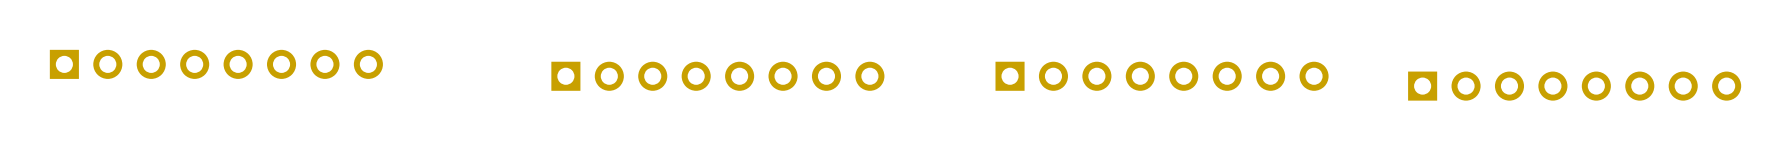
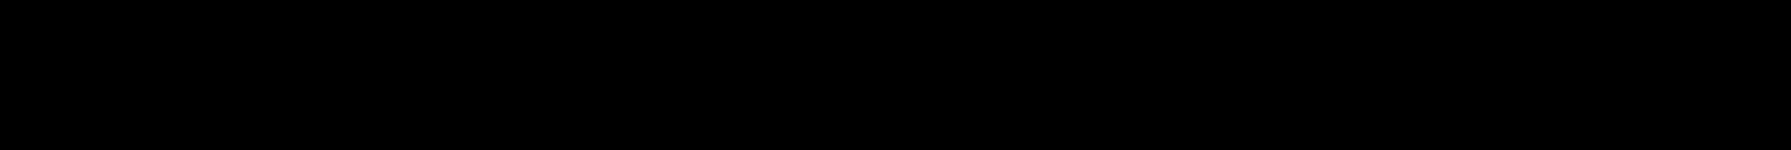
part: (216, 64) -> none
part: (717, 76) -> none
part: (1162, 76) -> none
part: (1574, 86) -> none

